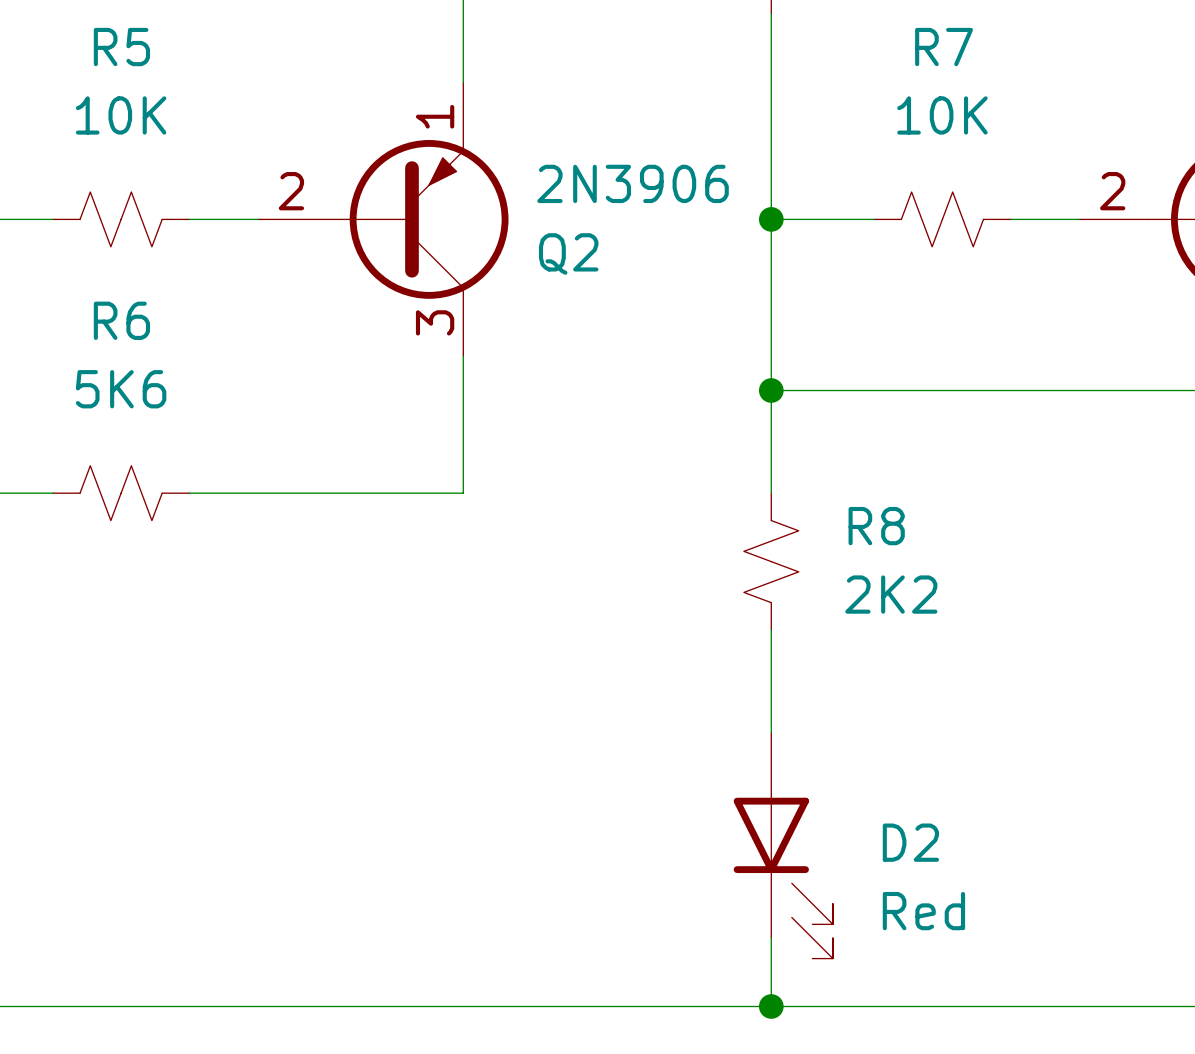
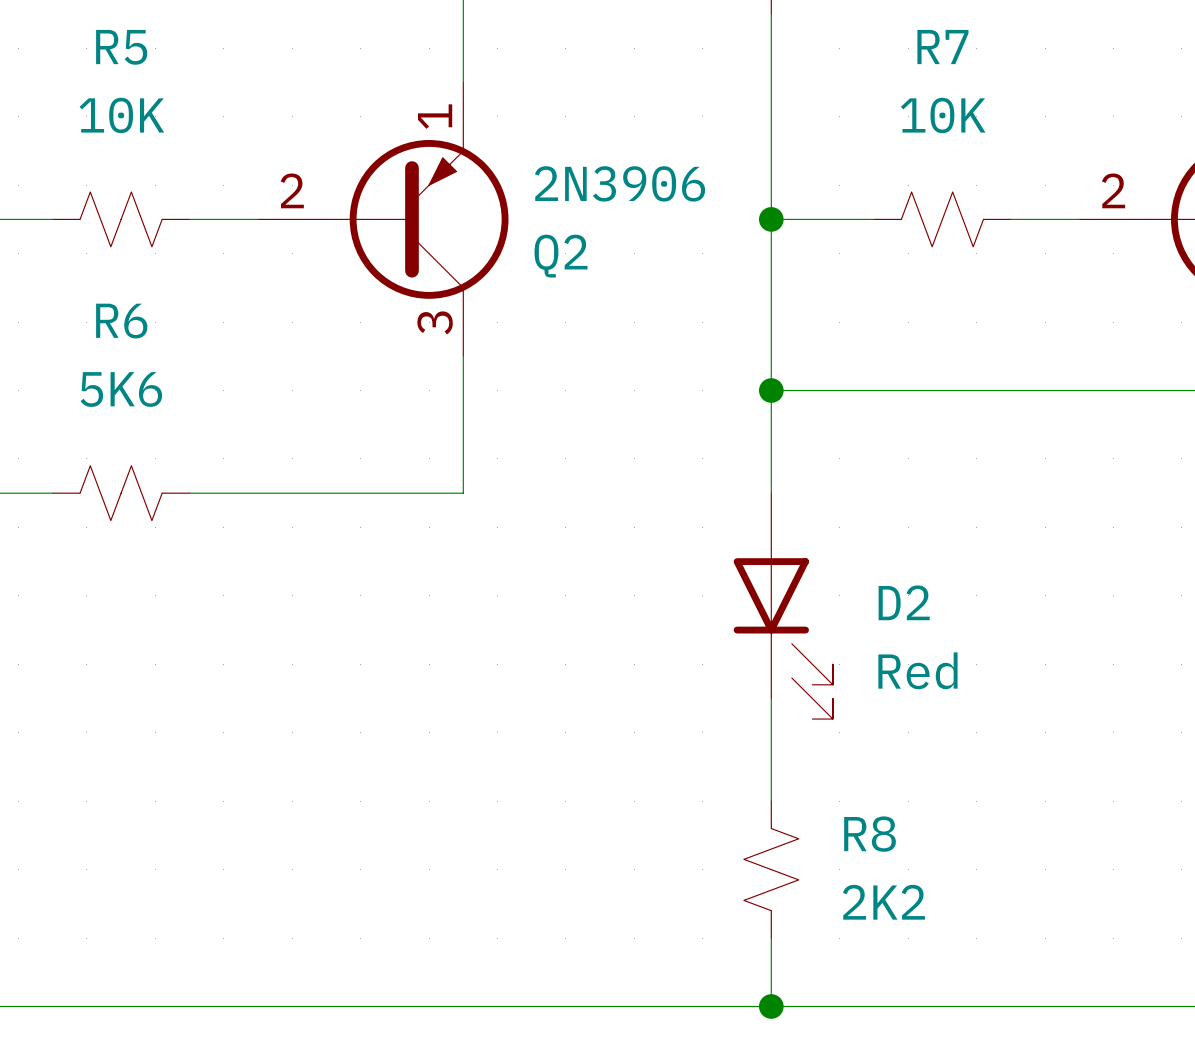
R8 position: (771, 561) -> (771, 869)
D2 position: (783, 845) -> (783, 606)

